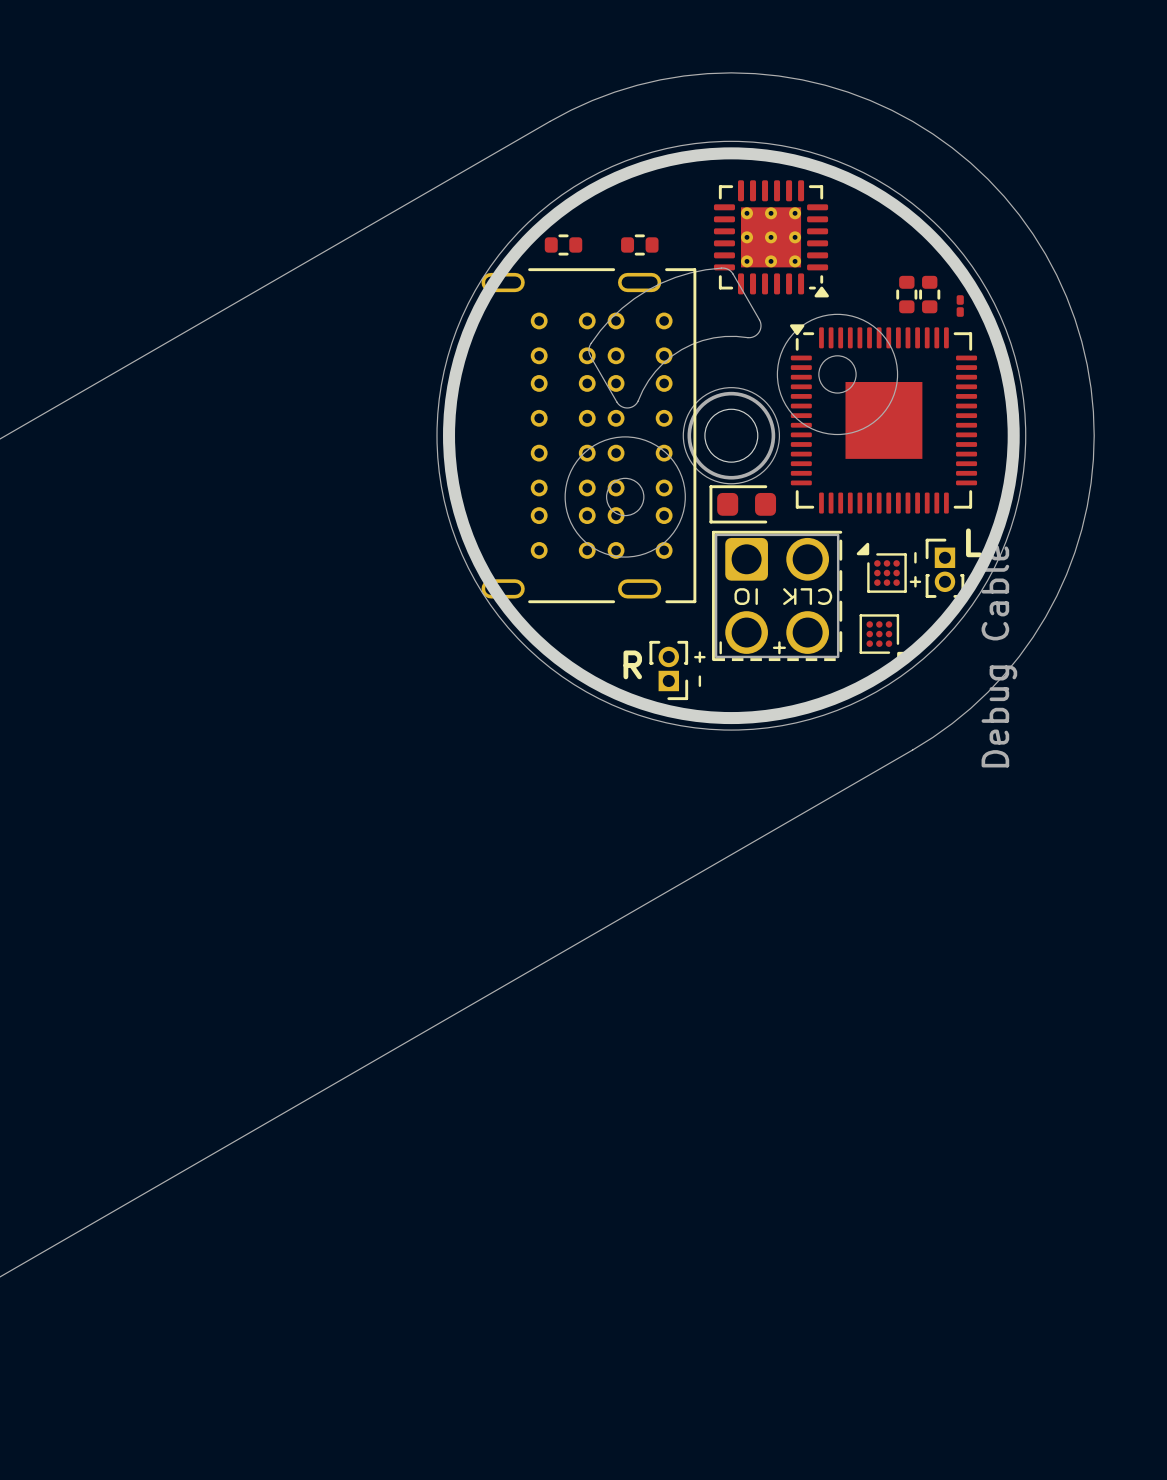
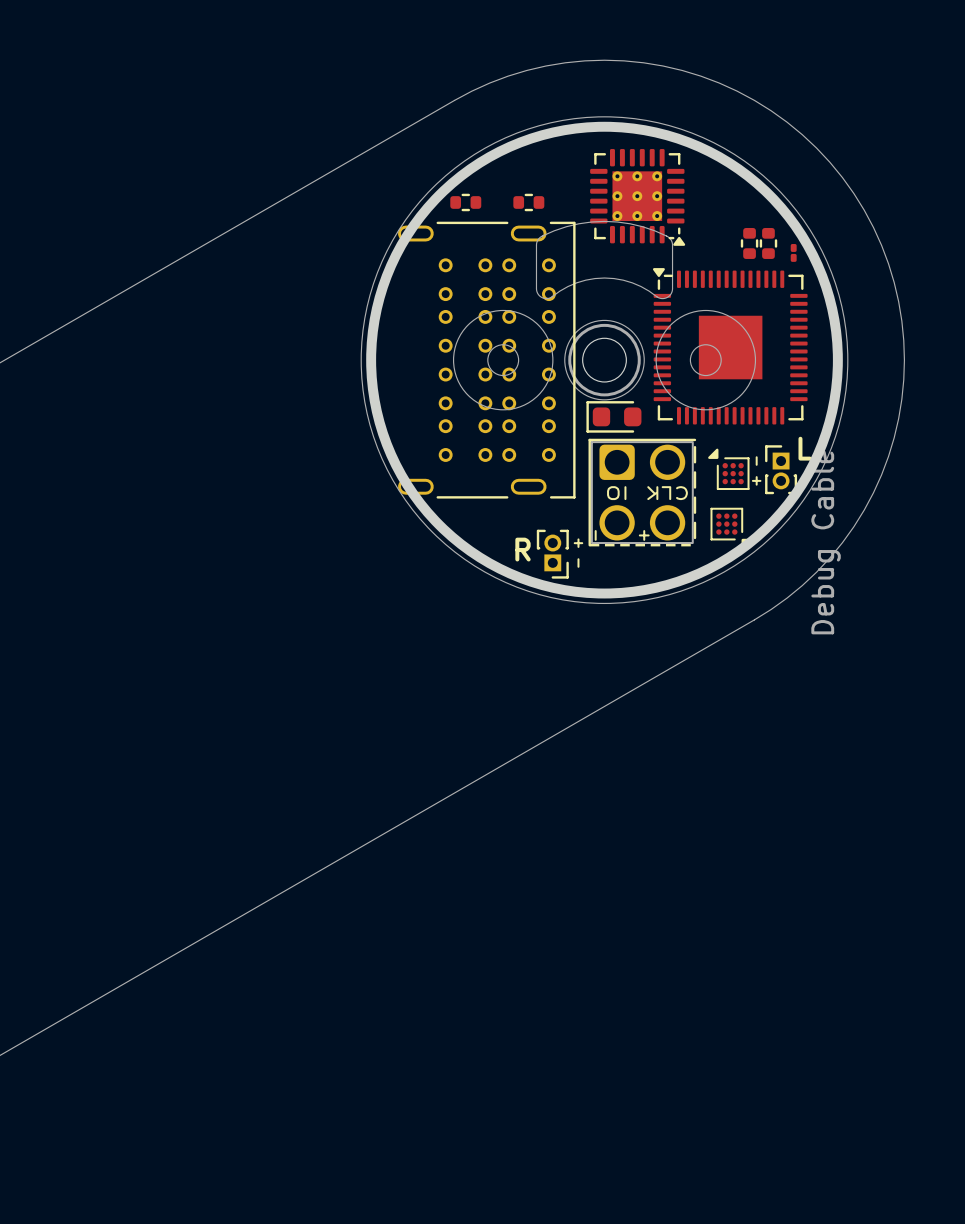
line: (721, 268) (728, 269) (732, 272) (759, 319) (760, 326) (758, 333) (750, 337) (713, 337) (681, 349) (655, 371) (635, 404) (627, 407) (619, 405) (589, 353) (589, 345) (600, 330) (622, 308) (647, 290) (690, 272) (721, 268) -> none
line: none -> (542, 236) (536, 243) (536, 288) (538, 294) (542, 297) (550, 297) (576, 282) (604, 278) (632, 282) (660, 298) (667, 297) (671, 292) (672, 242) (668, 237) (654, 230) (630, 223) (604, 221) (566, 226) (542, 236)
drawing: [818, 355, 857, 394] -> none
drawing position: (837, 374) -> (705, 360)
drawing: none -> [689, 344, 722, 377]
drawing position: (625, 496) -> (503, 360)
drawing position: (625, 496) -> (503, 360)

